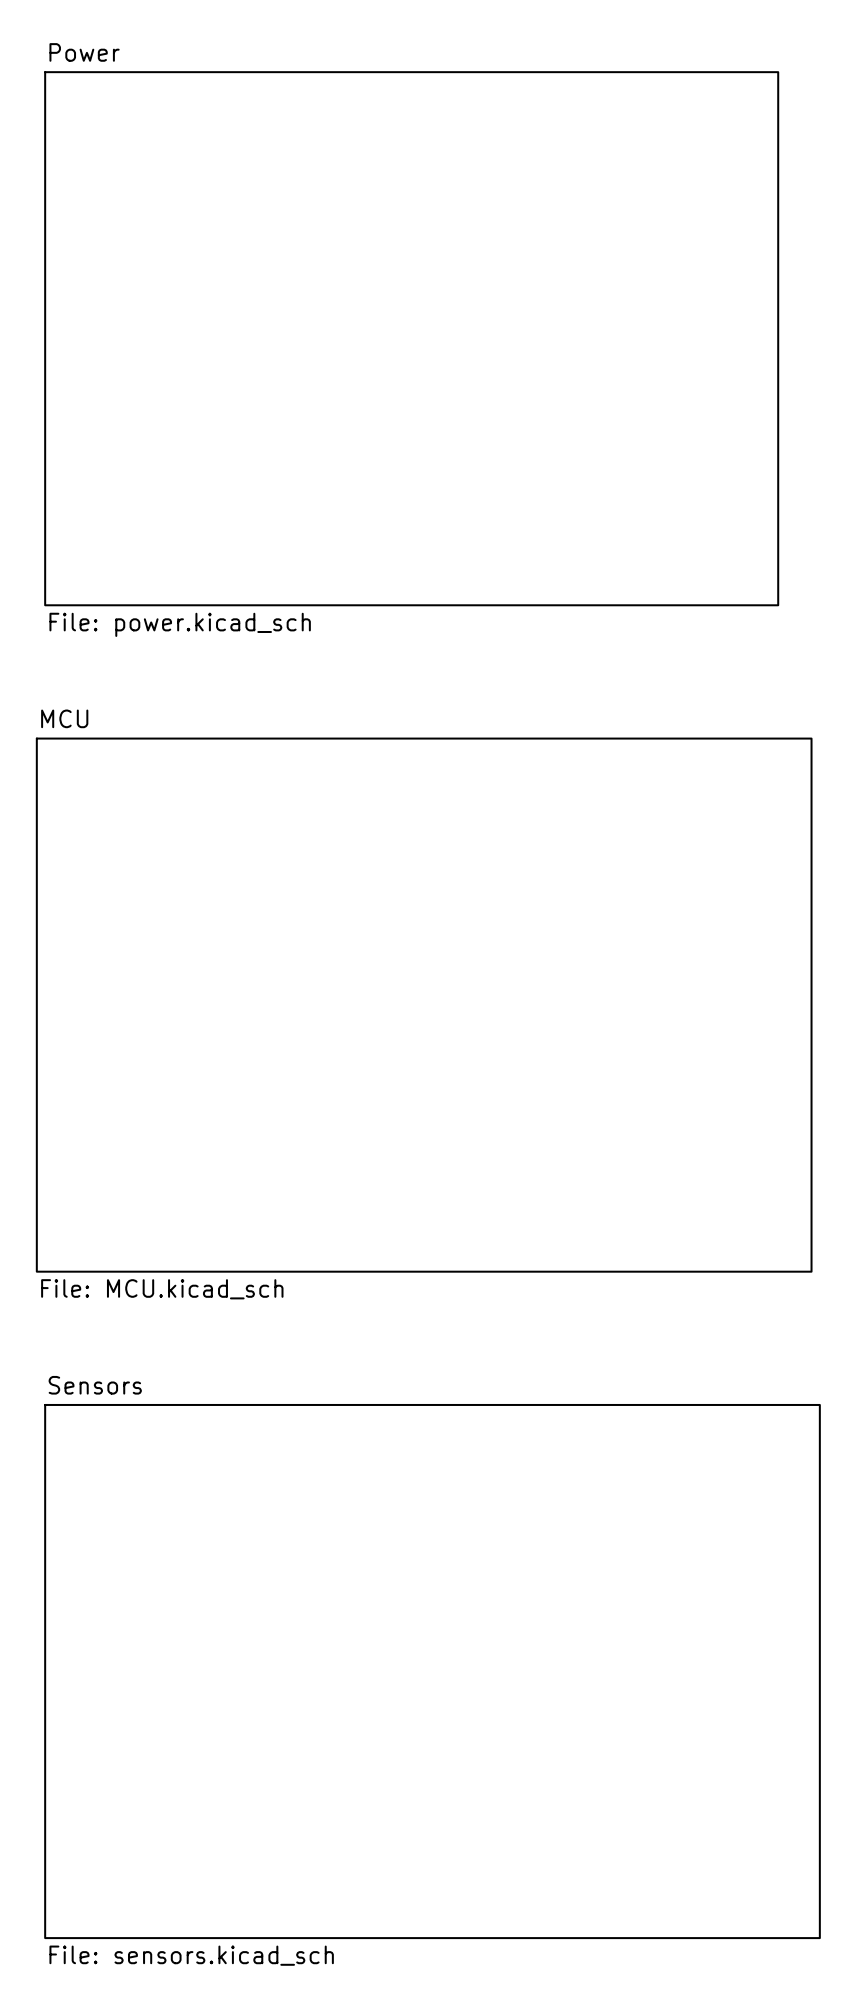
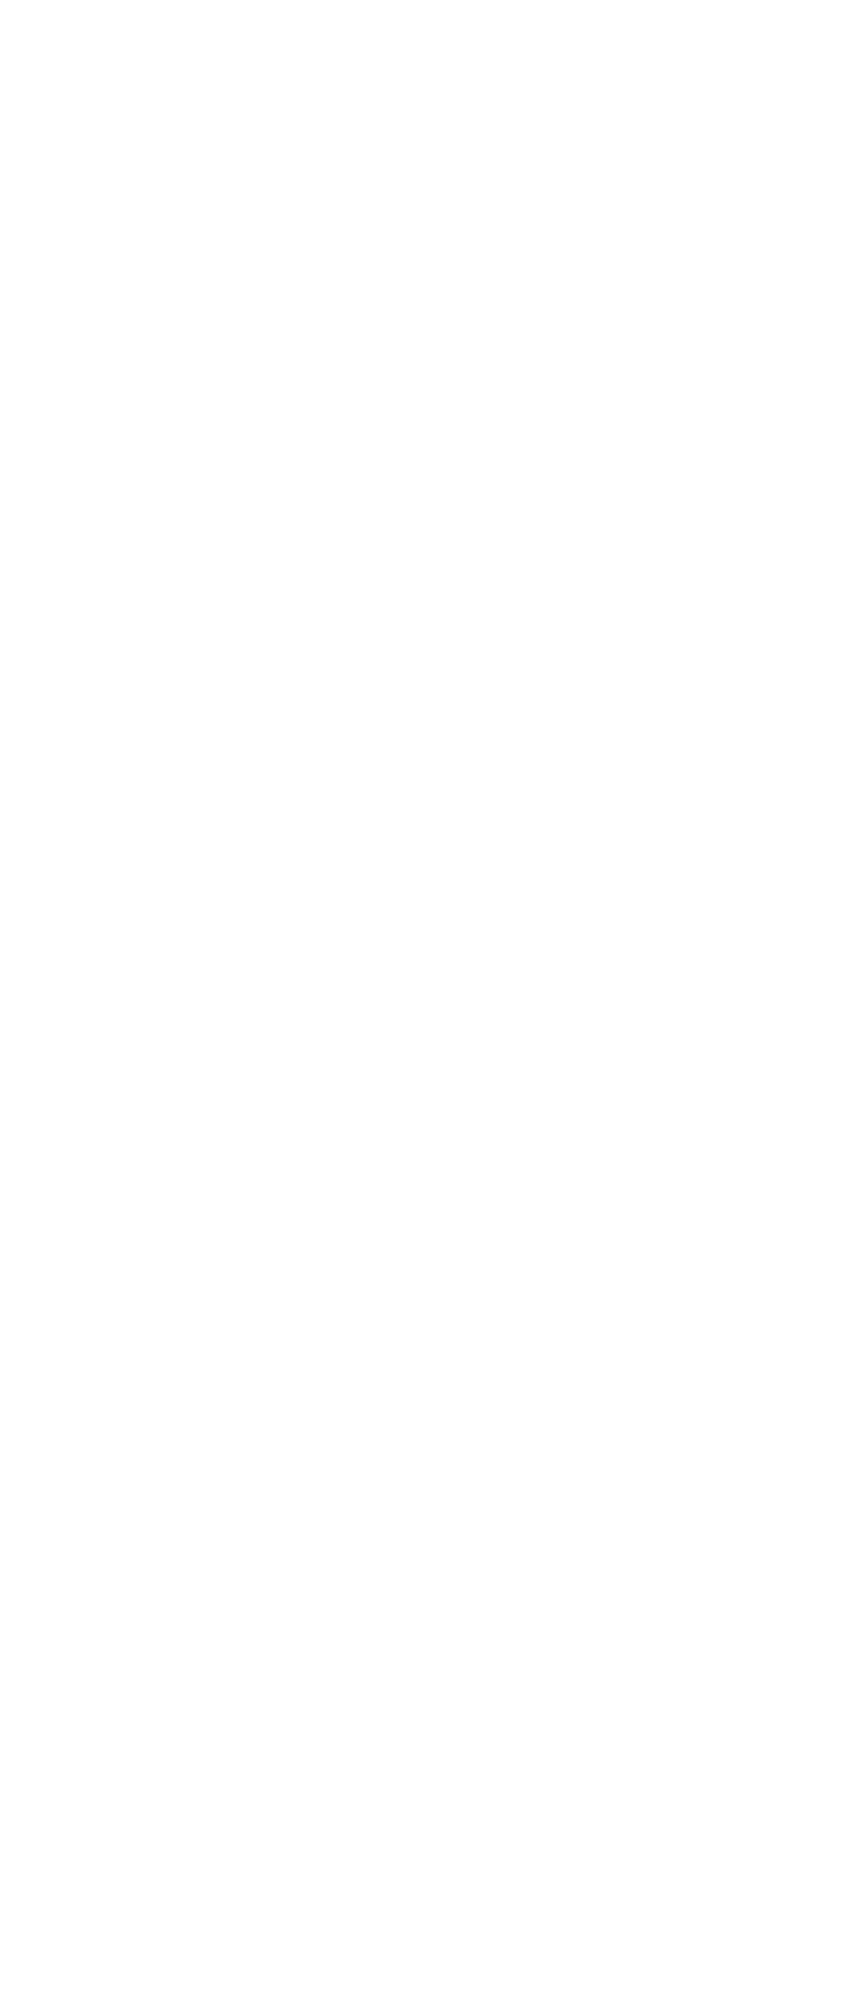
sheet Power: File: power.kicad_sch (411, 338) -> none
sheet MCU: File: MCU.kicad_sch (424, 1005) -> none
sheet Sensors: File: sensors.kicad_sch (432, 1671) -> none

